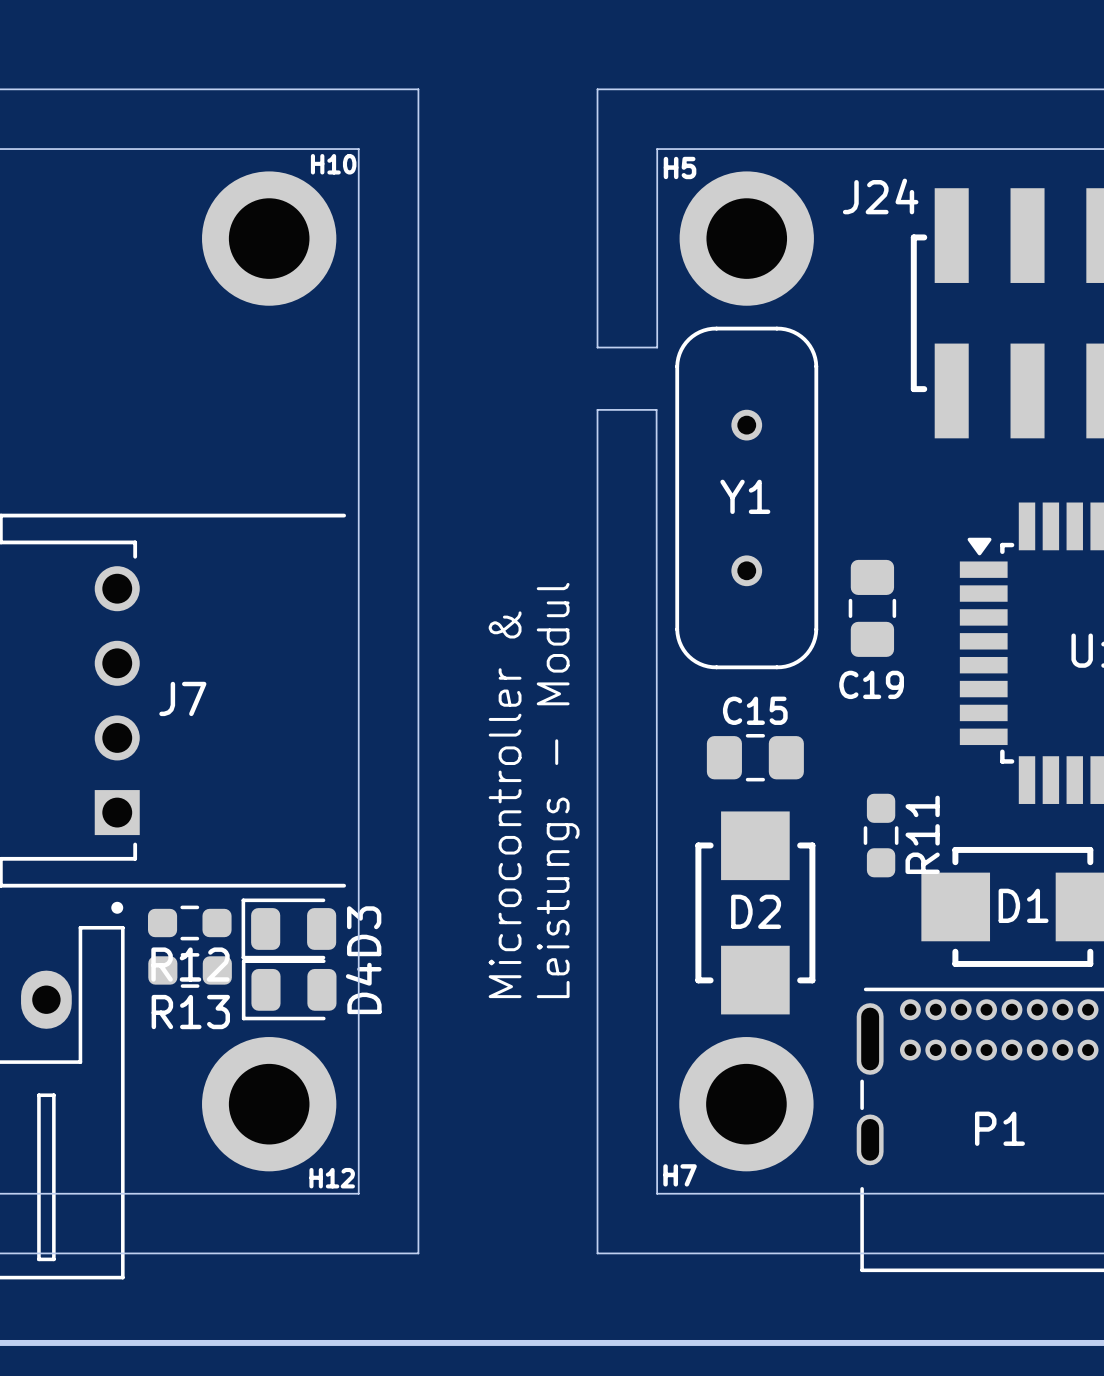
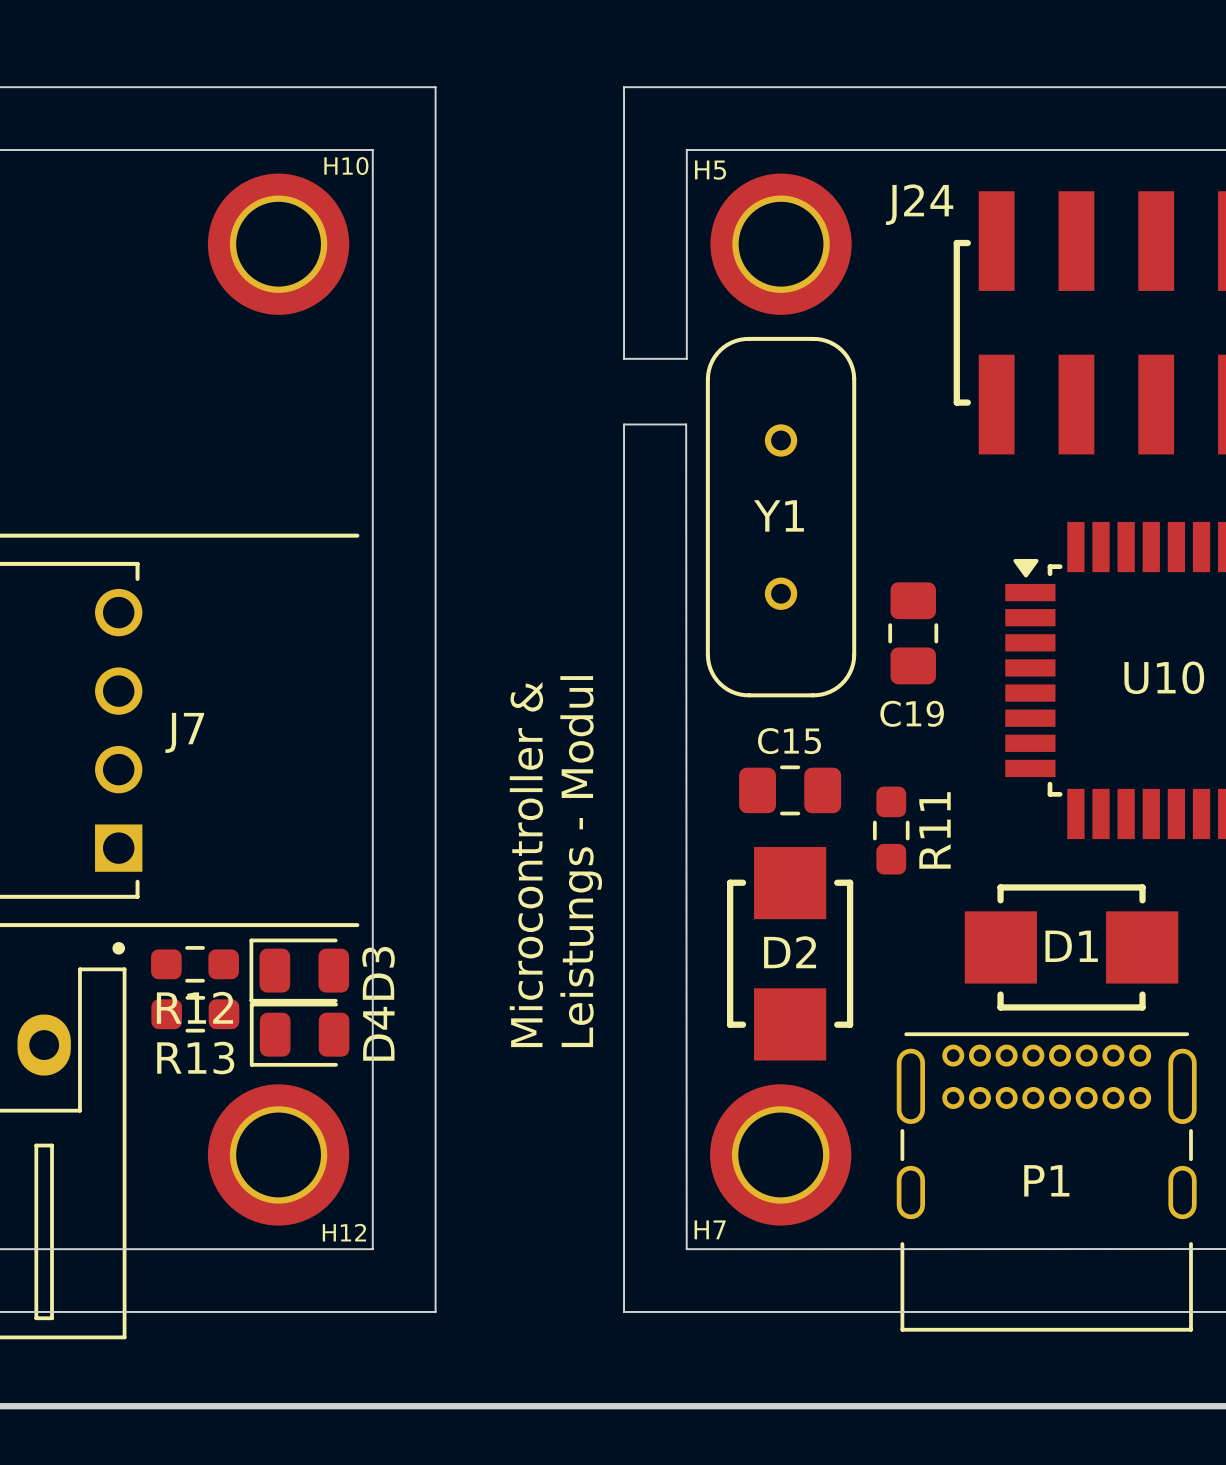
R11 position: (881, 835) -> (891, 830)

